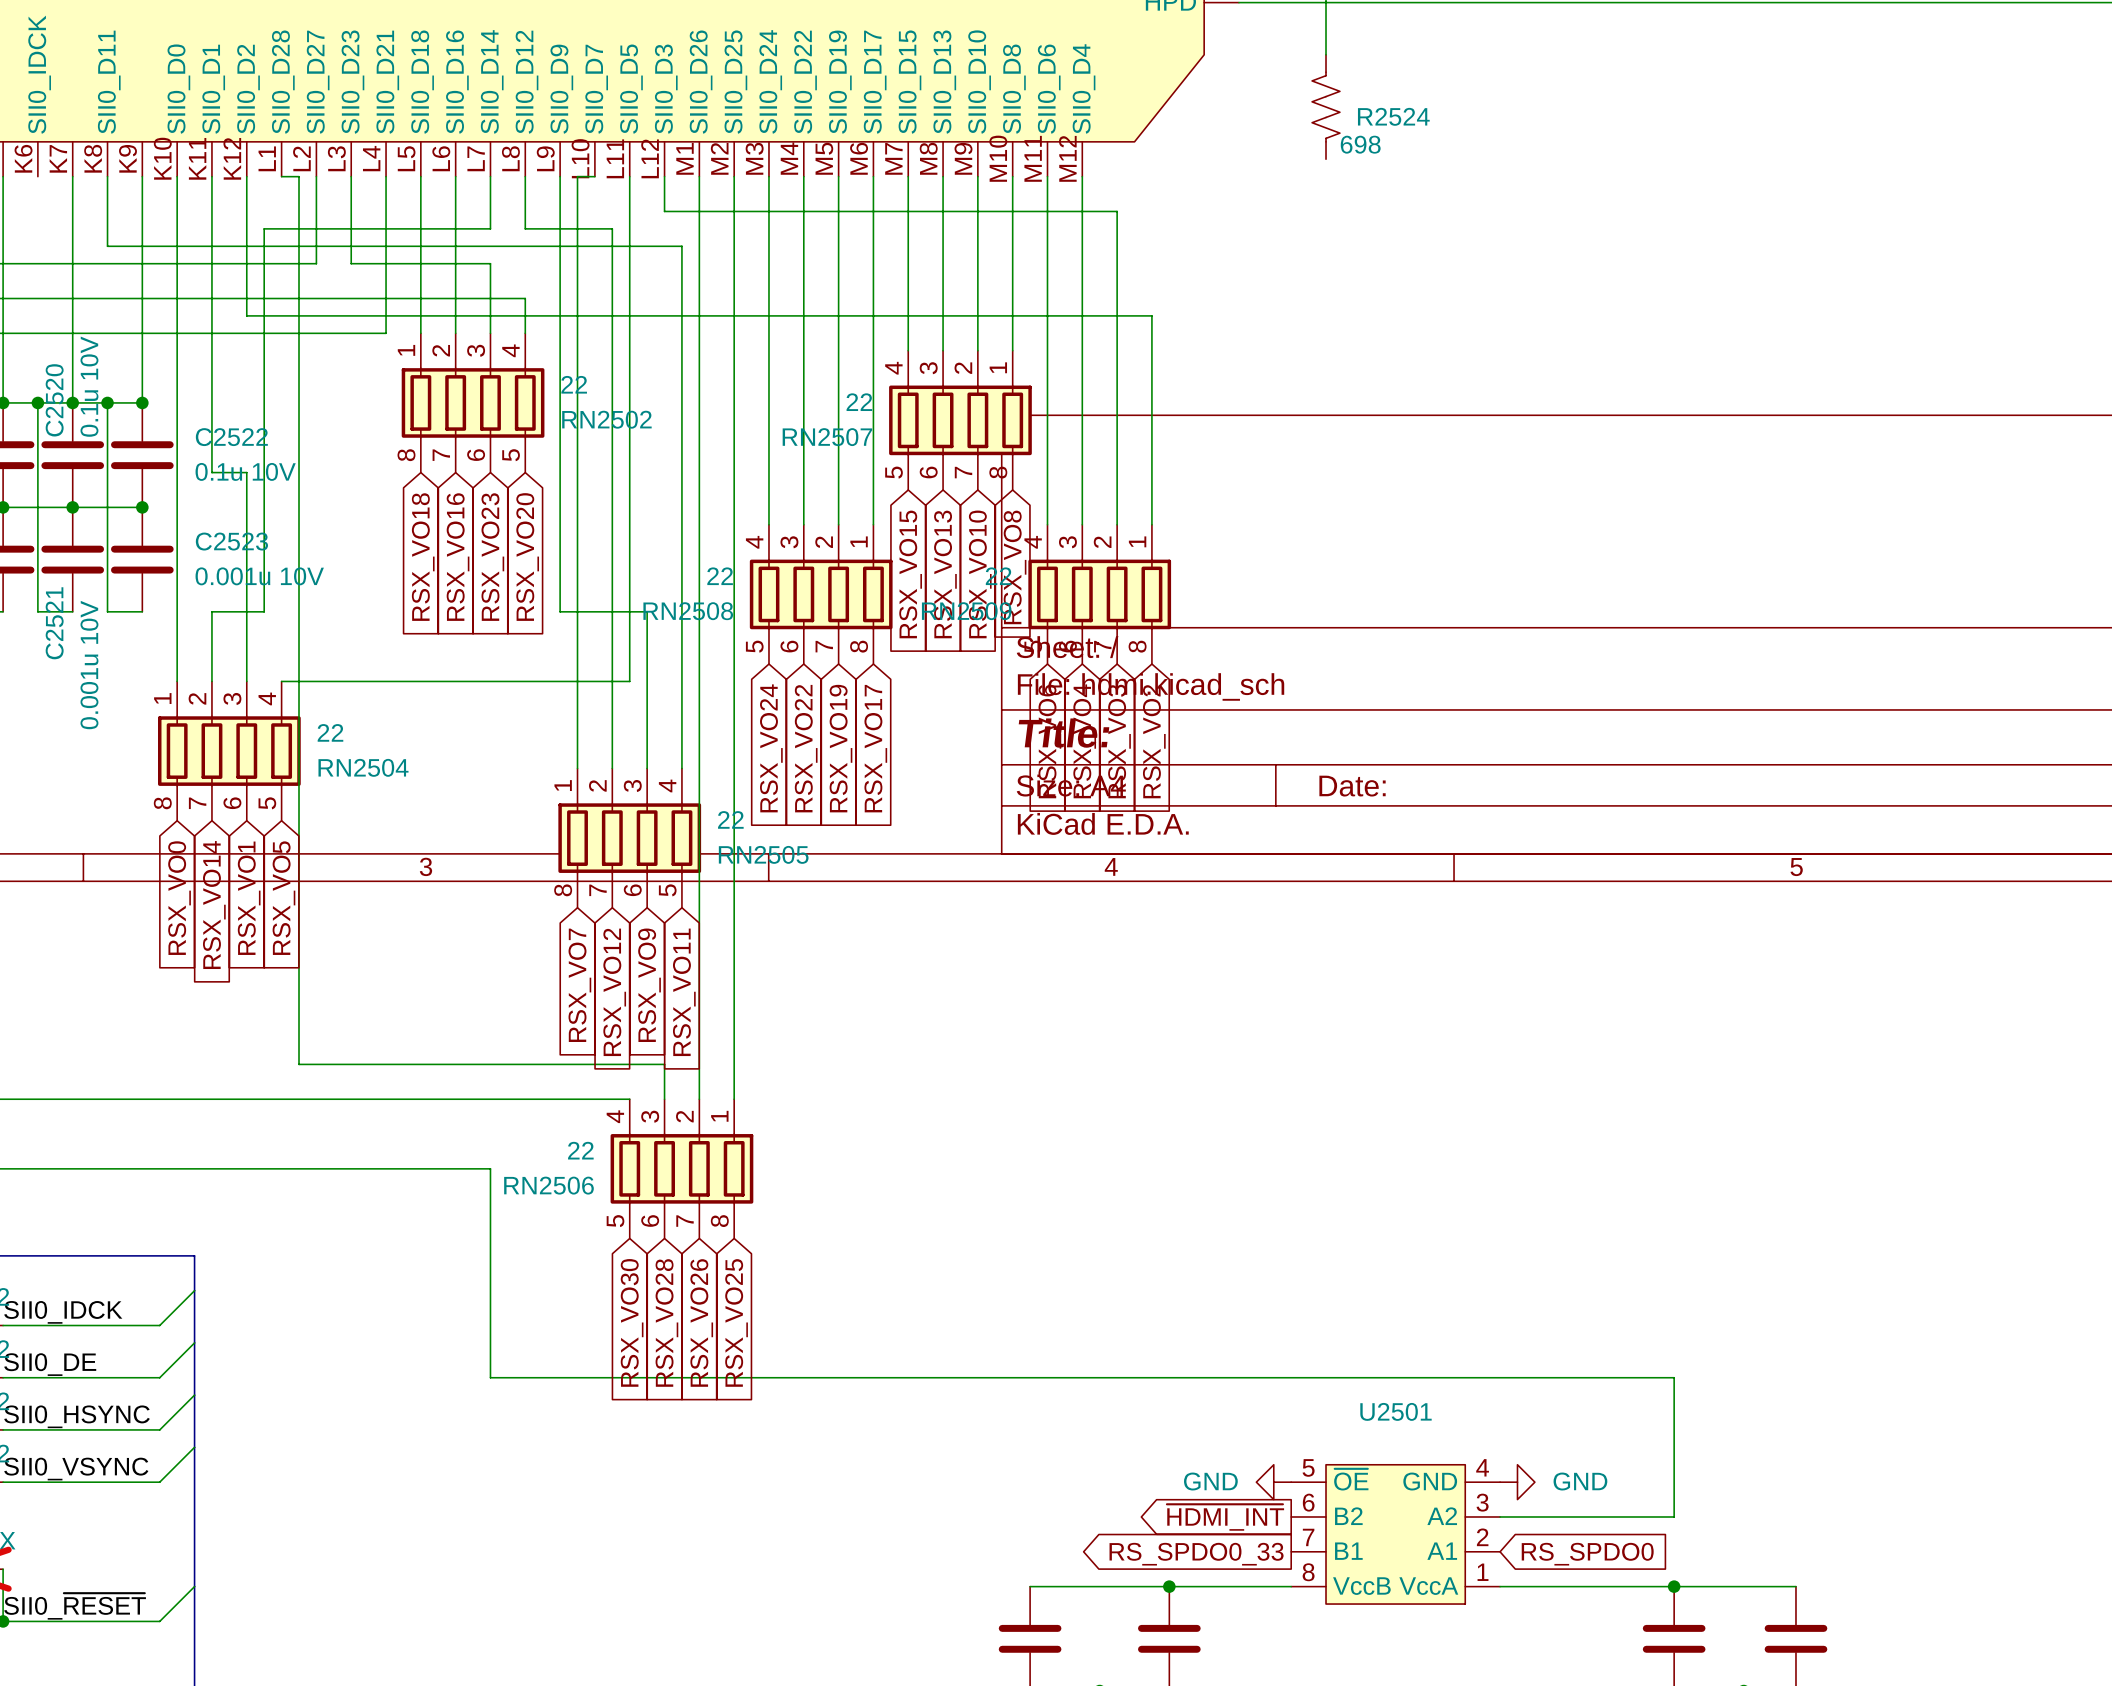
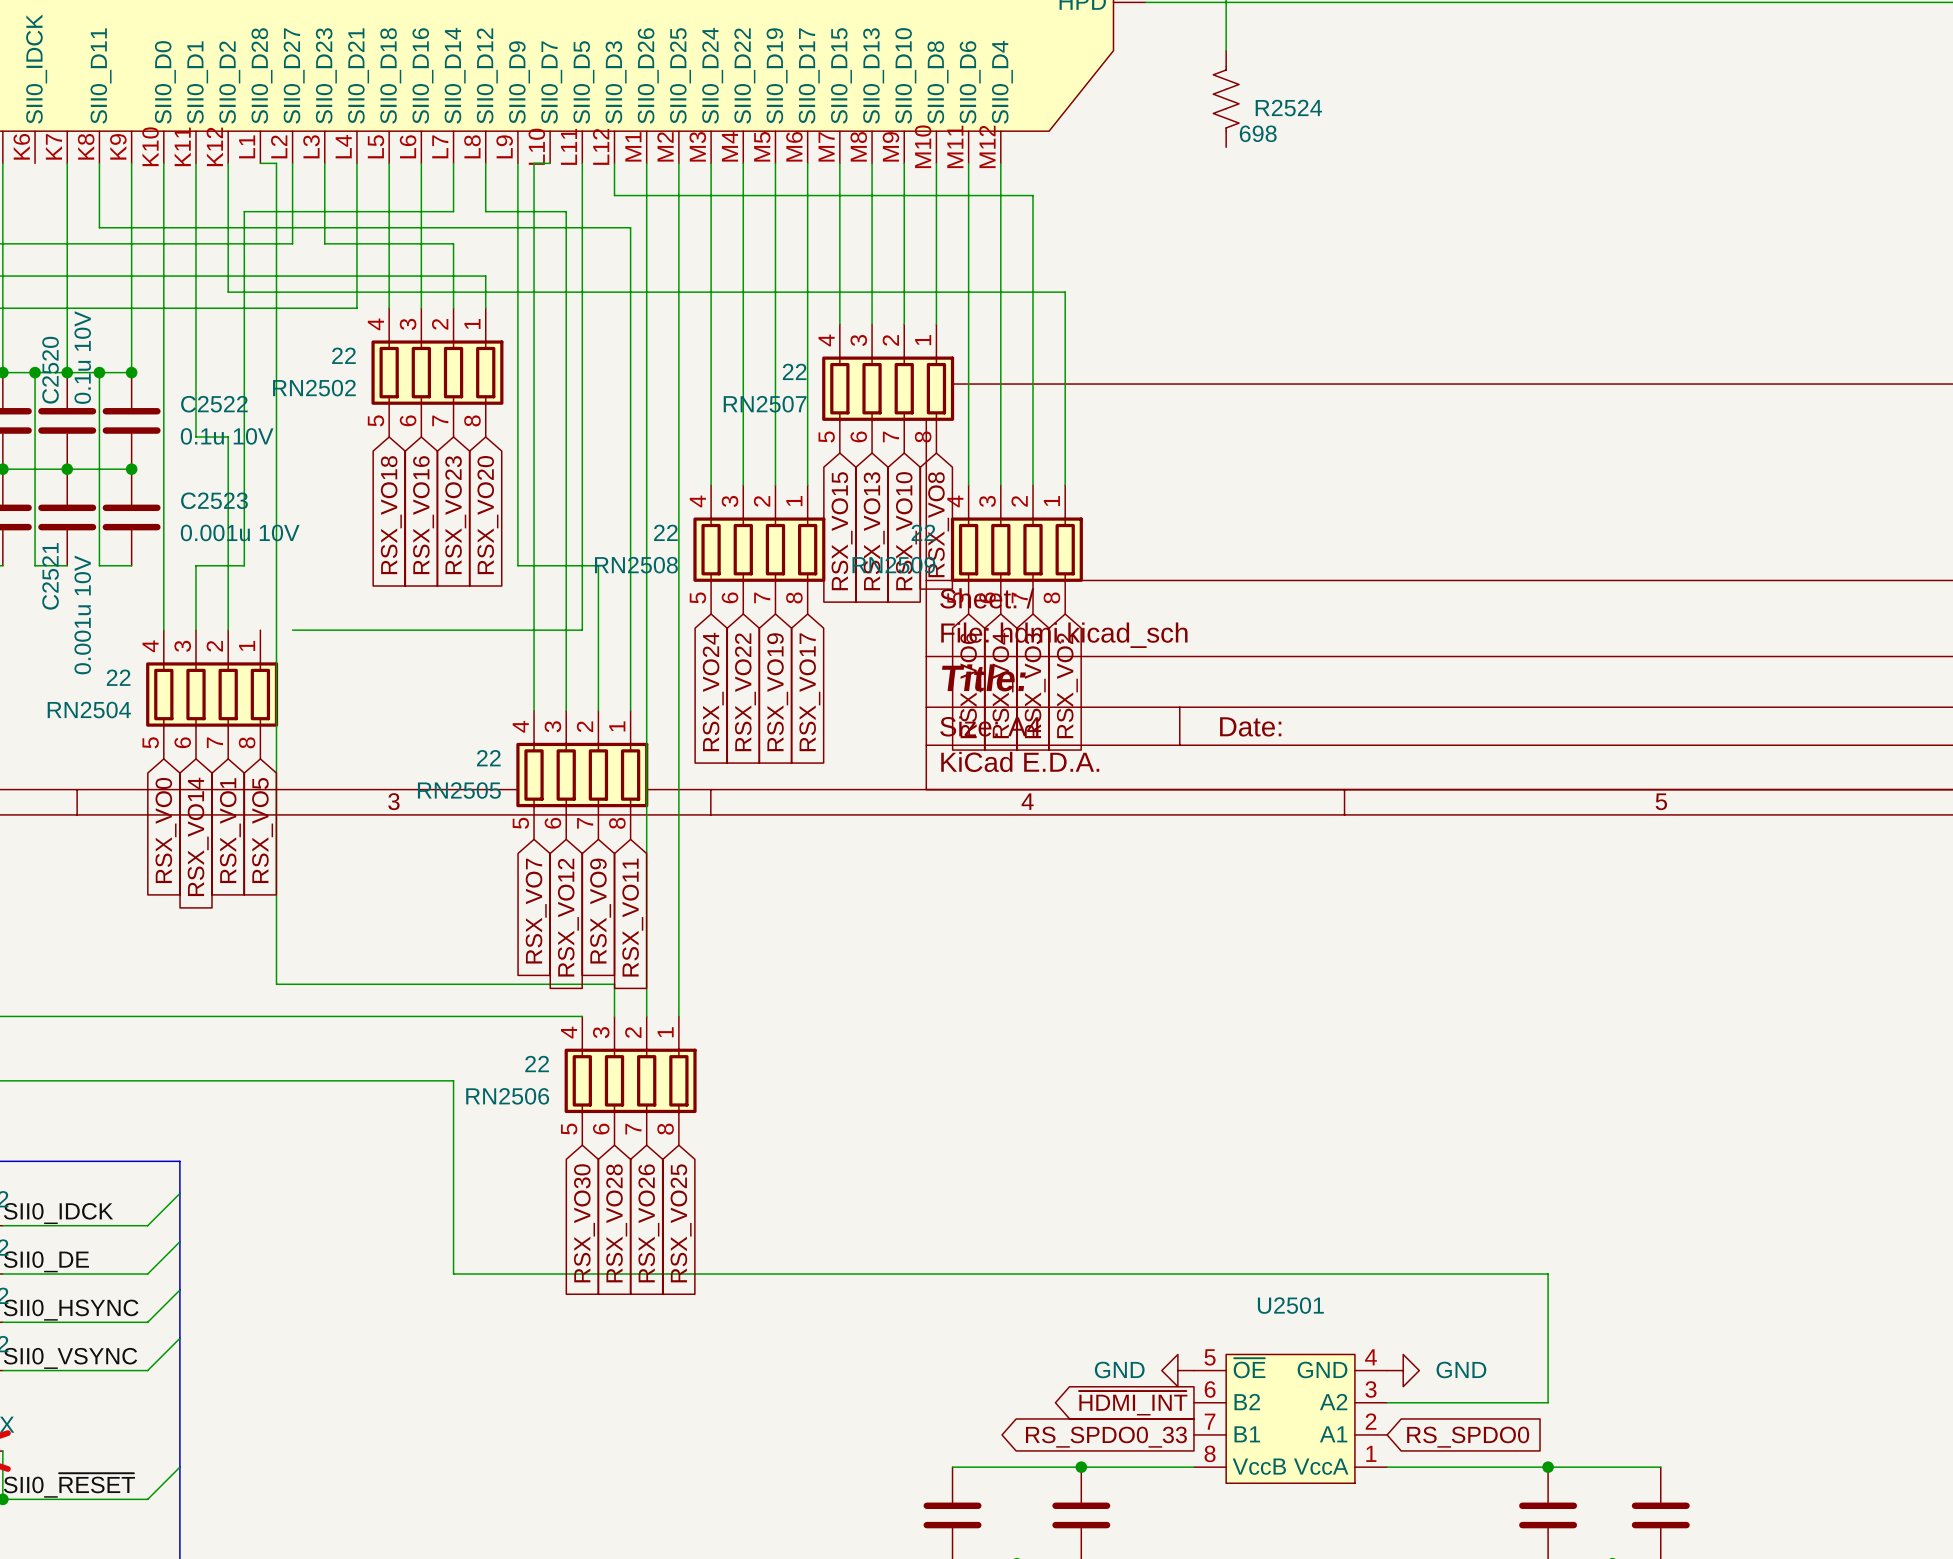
RN2502 flip: as is (473, 402) -> left-right (437, 372)
wire: (281, 681) (316, 681) -> none
RN2504 flip: as is (229, 751) -> left-right (212, 694)
RN2505 flip: as is (629, 838) -> left-right (582, 775)

